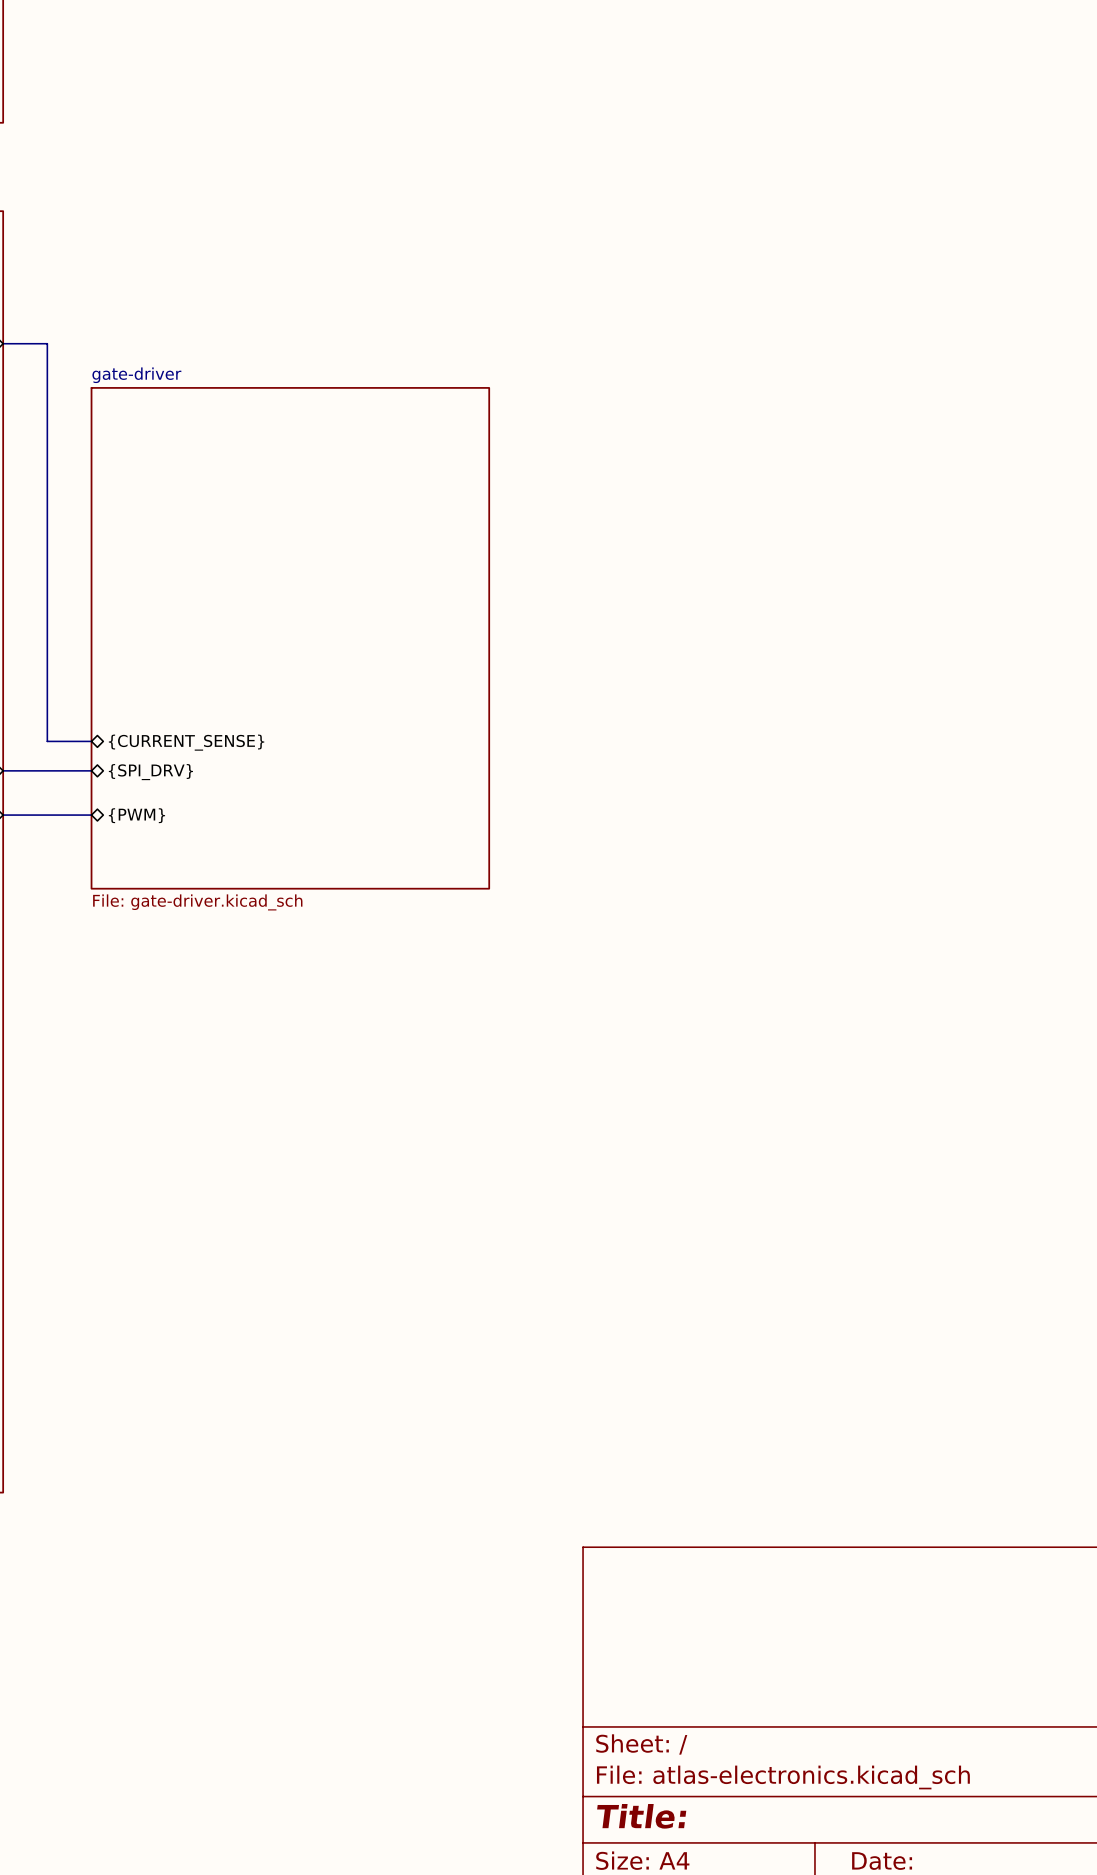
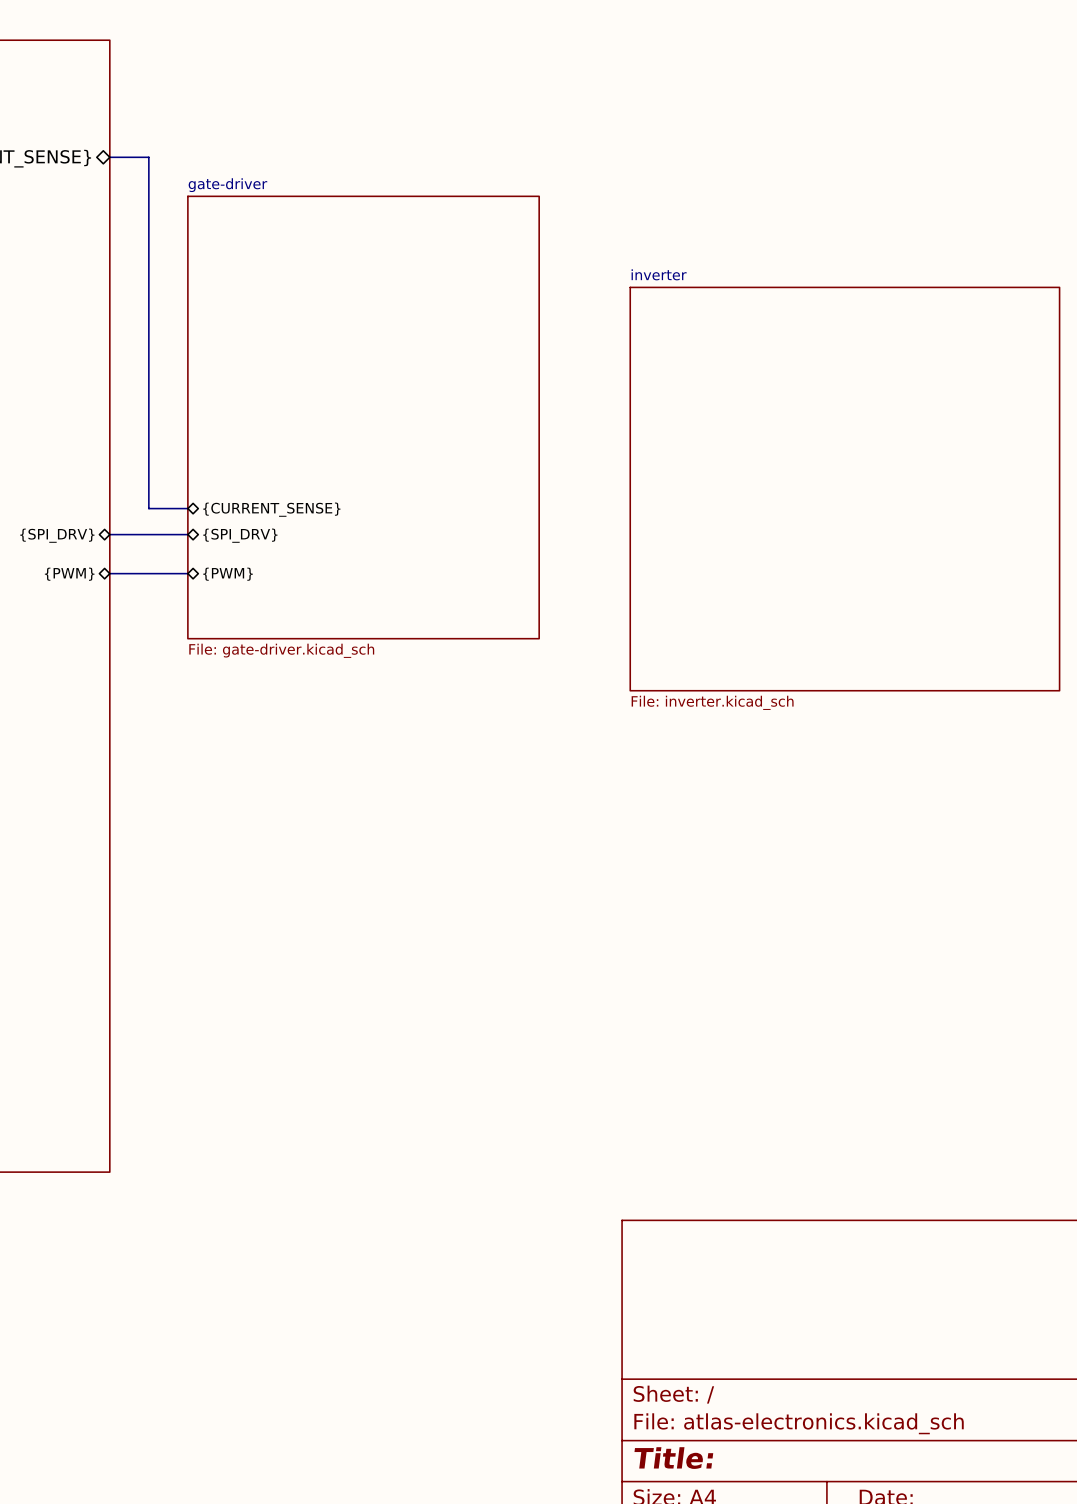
sheet inverter: none -> File: inverter.kicad_sch (844, 489)

